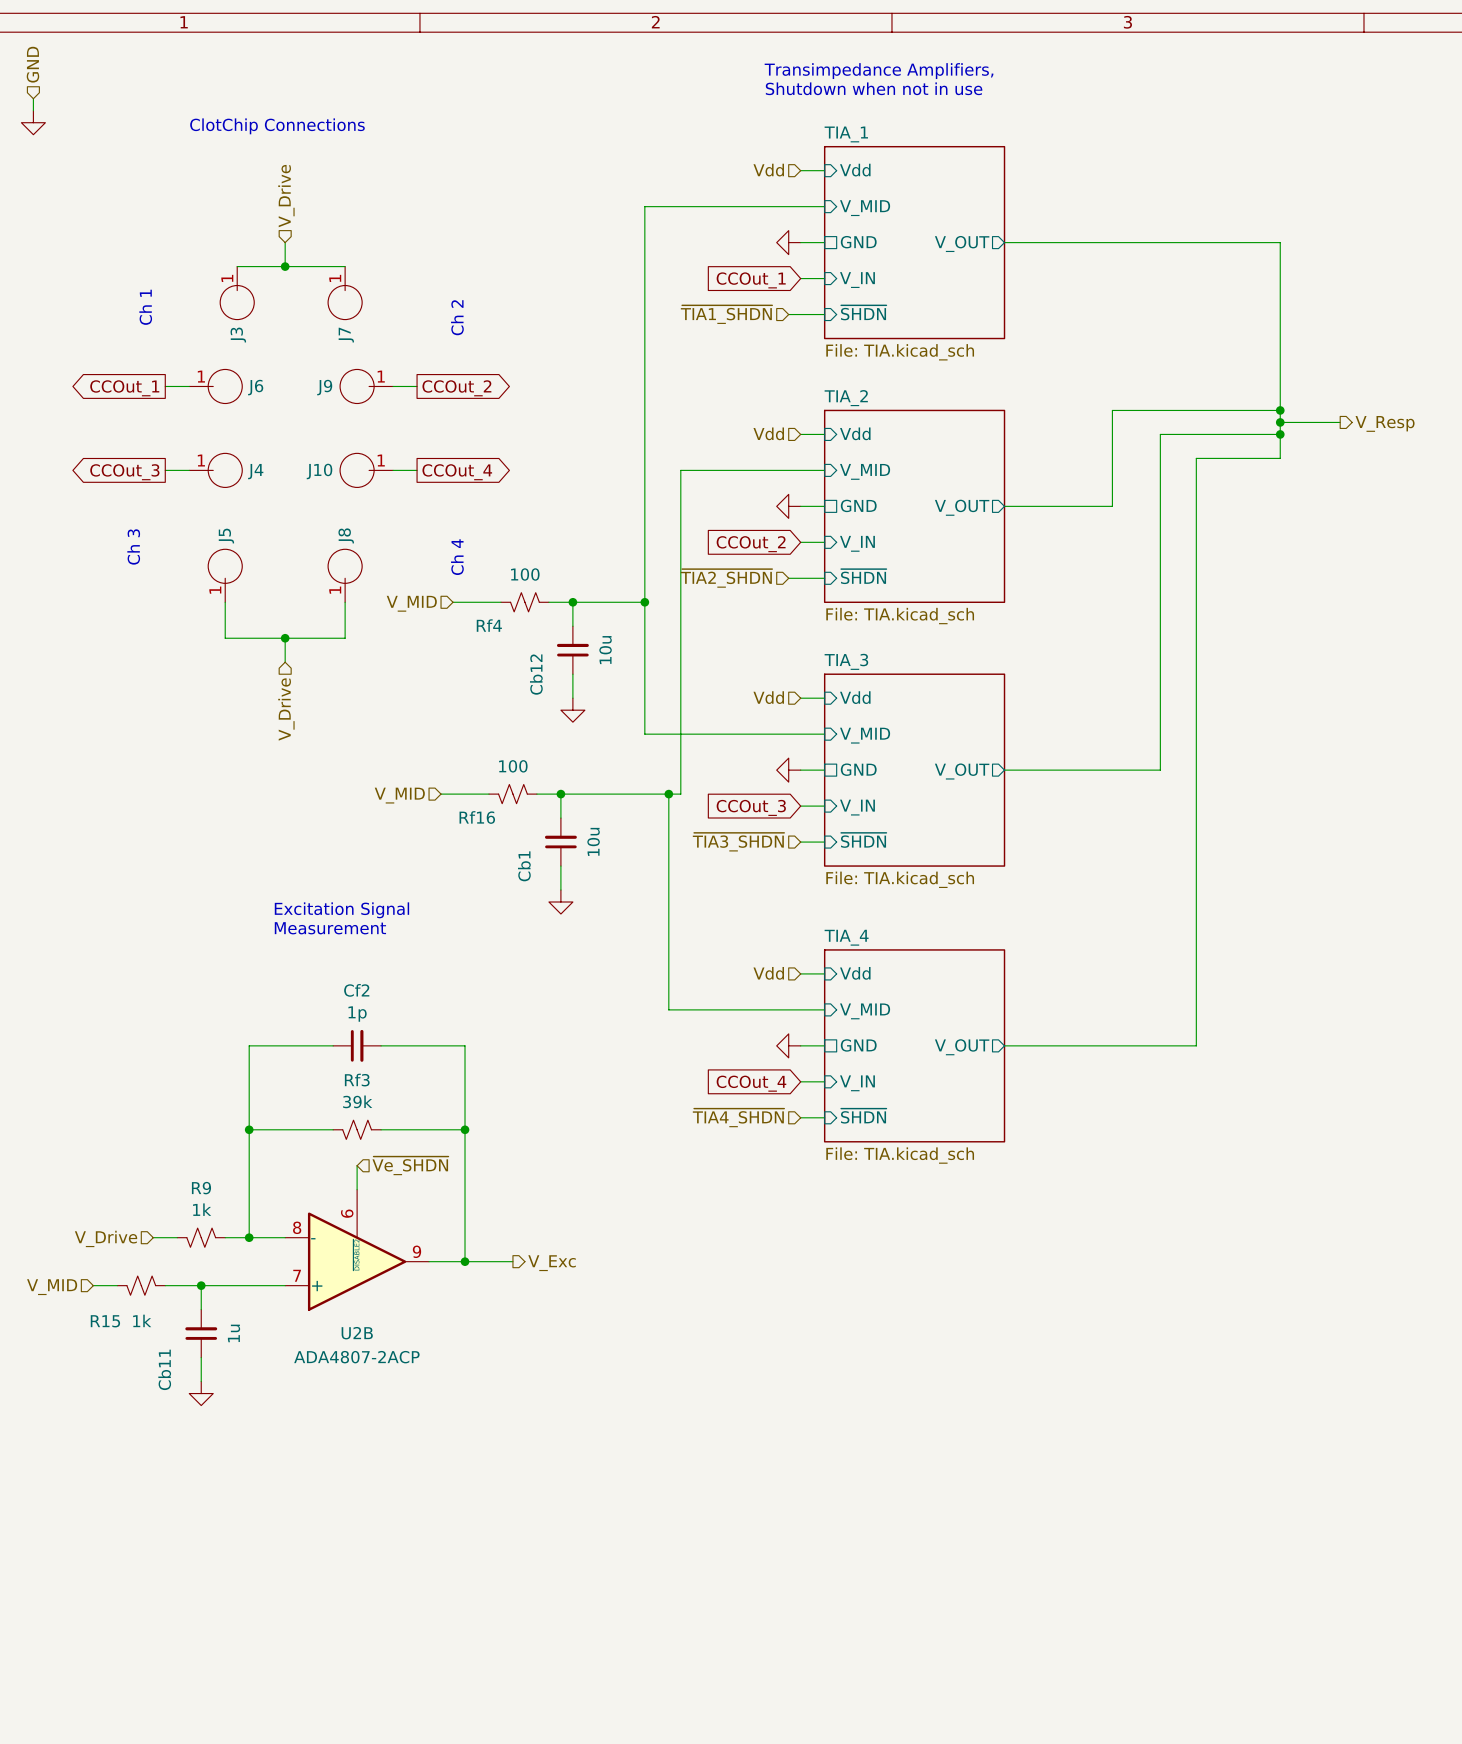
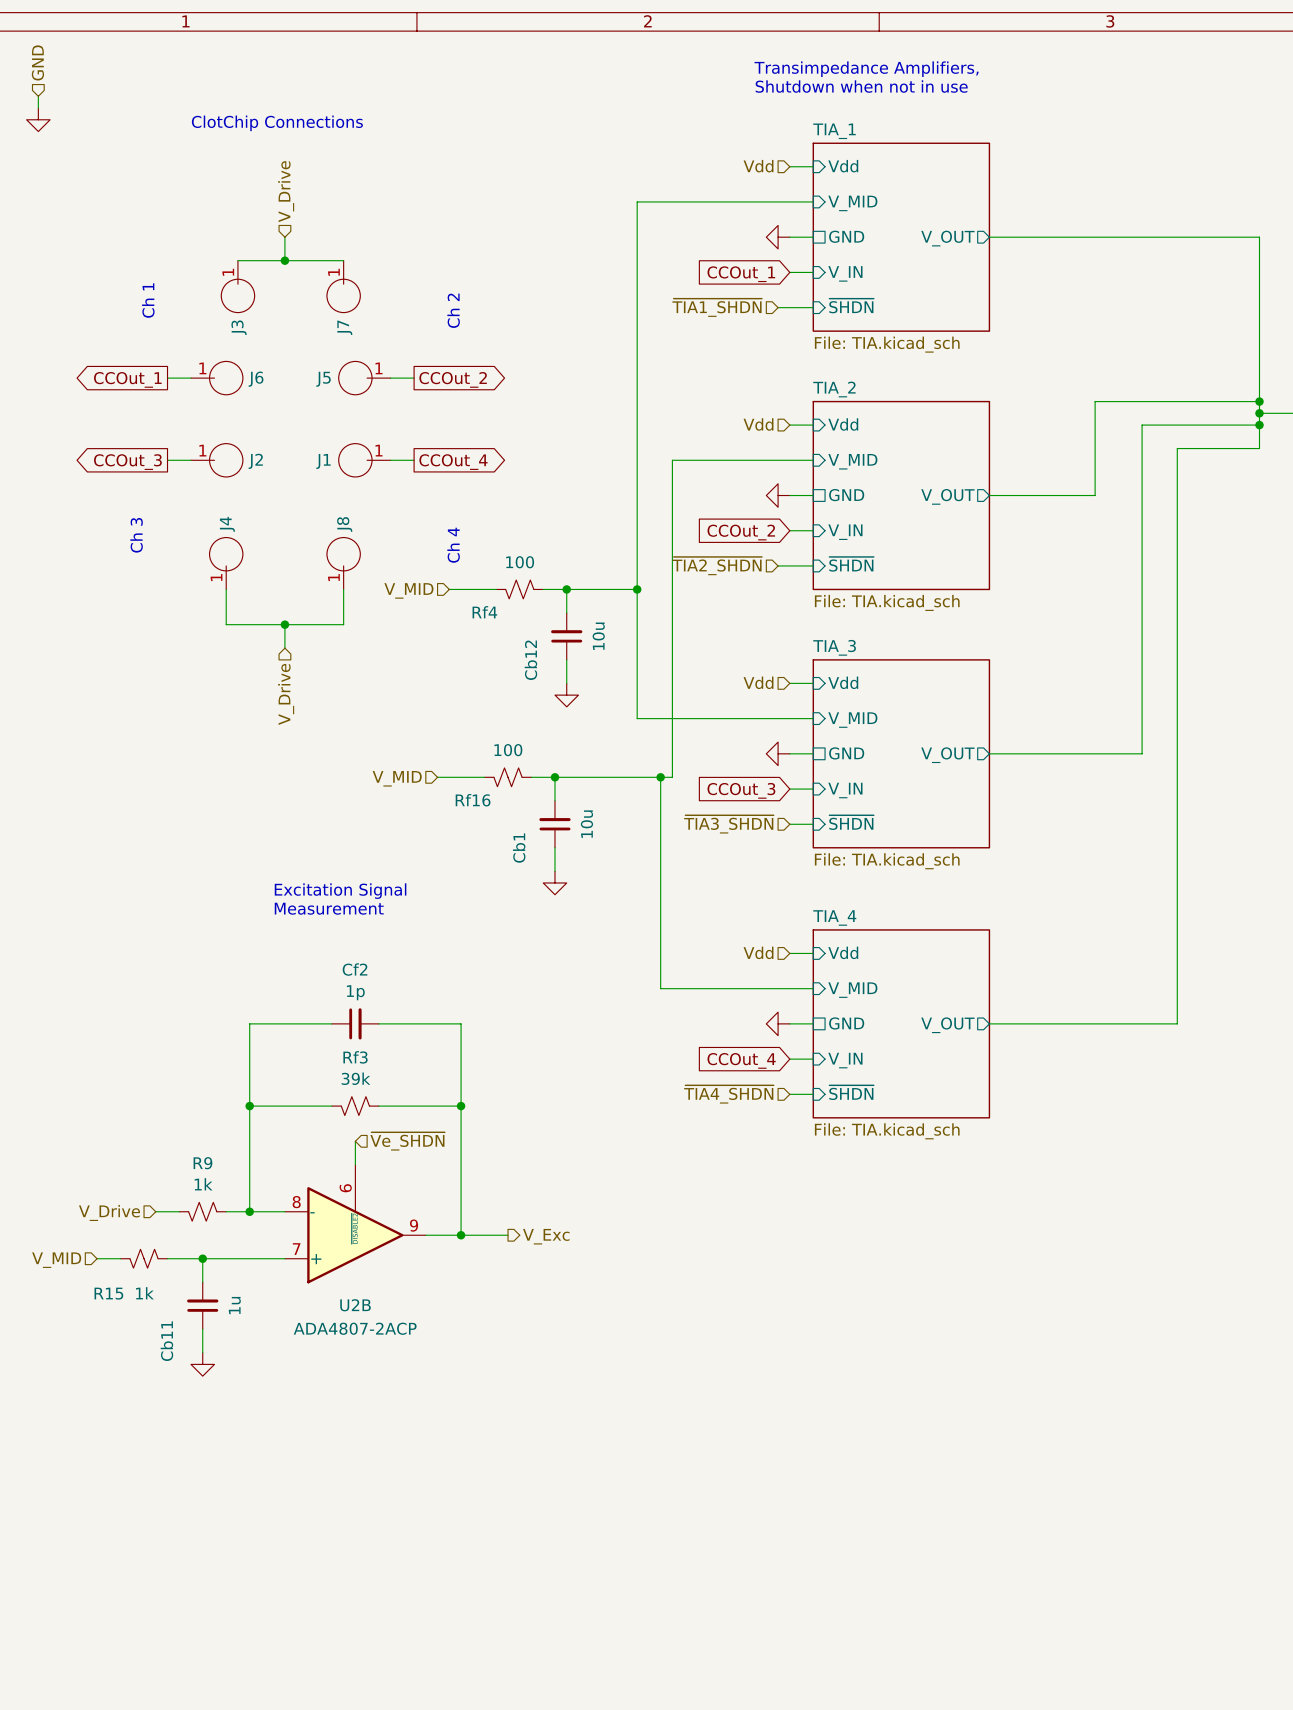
J9 name: J9 (324, 387) -> J5 (323, 379)
J4 name: J4 (255, 471) -> J2 (255, 461)
J10 name: J10 (319, 471) -> J1 (323, 461)
J5 name: J5 (226, 536) -> J4 (227, 524)

